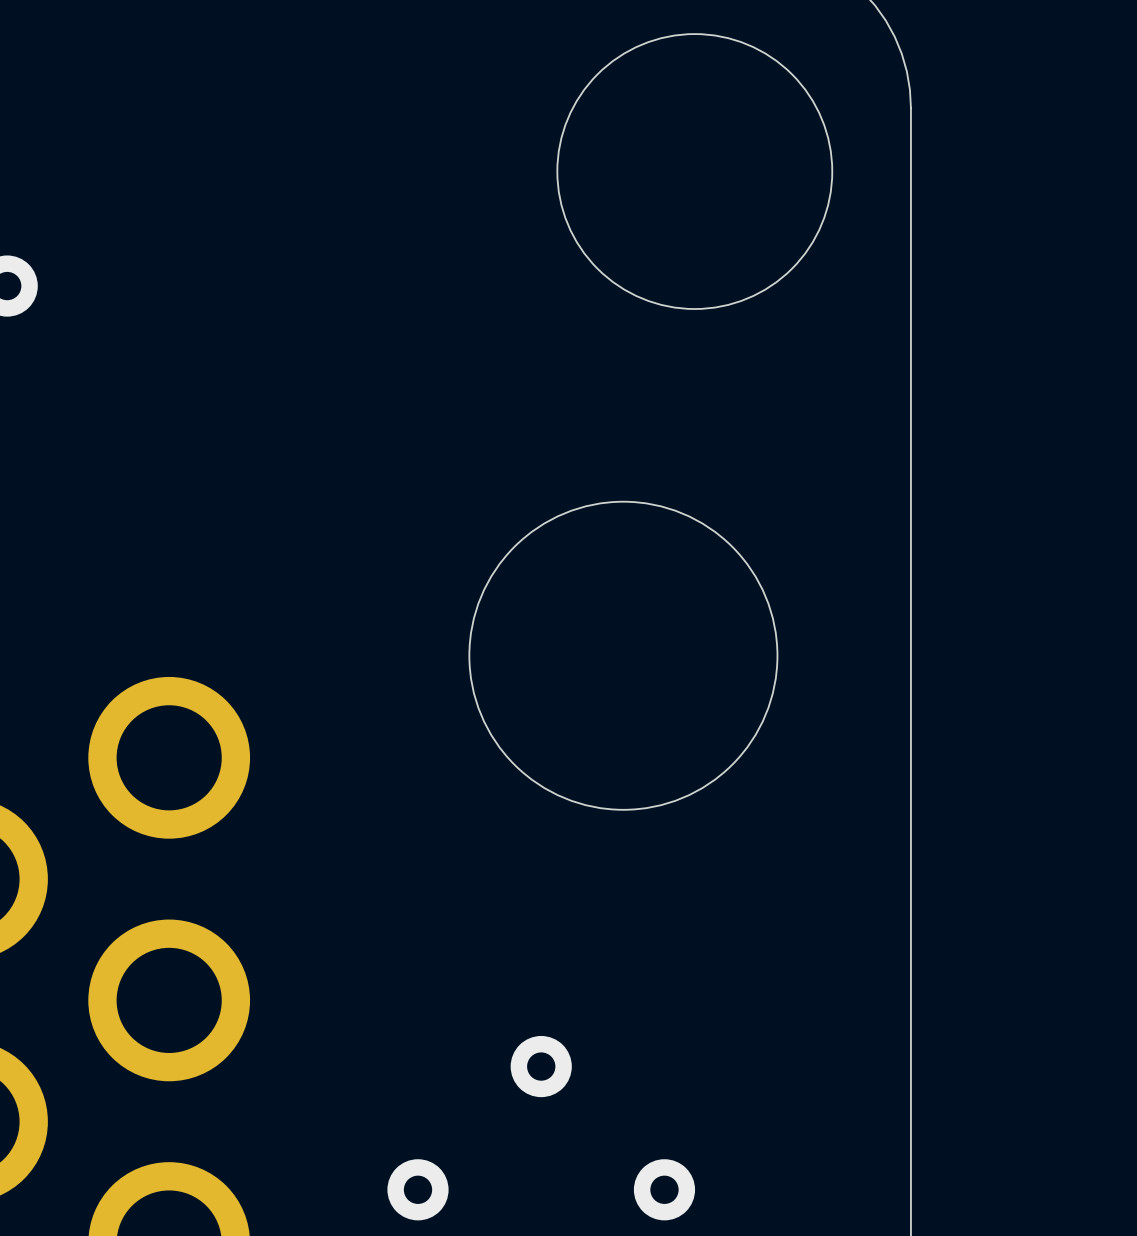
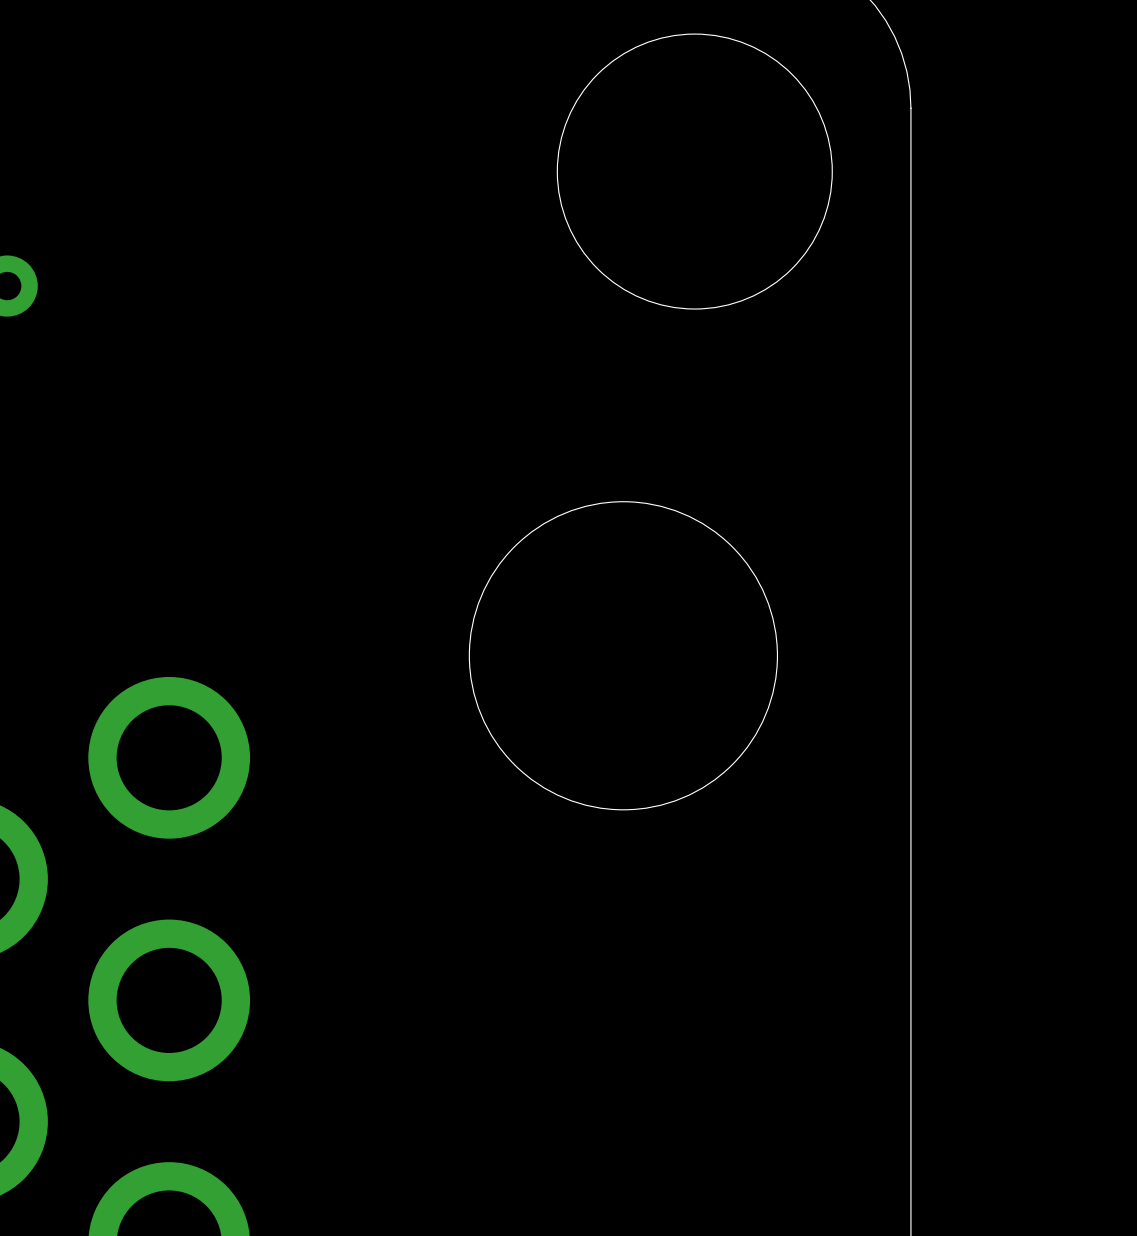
via: (541, 1066) -> none
via: (418, 1189) -> none
via: (664, 1189) -> none

